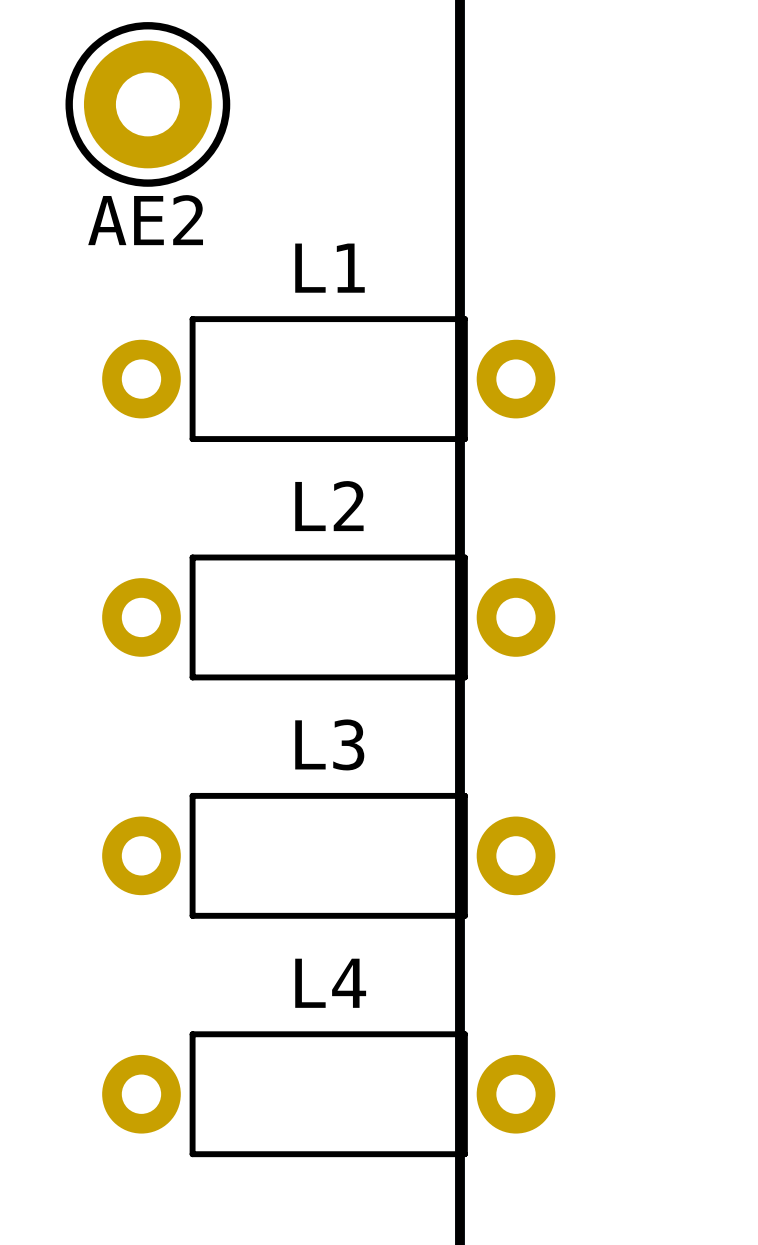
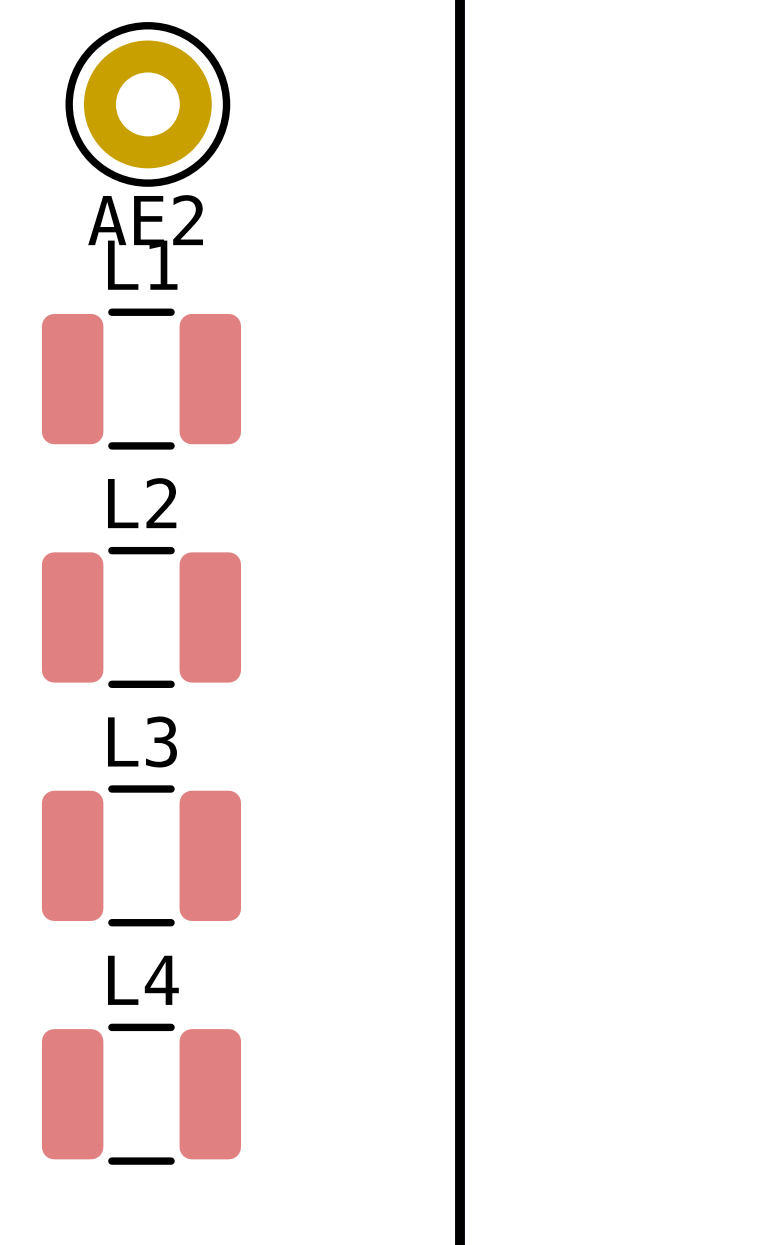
L1 footprint: [102, 316, 556, 443] -> [41, 308, 242, 450]
L2 footprint: [102, 554, 556, 681] -> [41, 546, 242, 689]
L3 footprint: [102, 792, 556, 919] -> [41, 785, 242, 927]
L4 footprint: [102, 1031, 556, 1158] -> [41, 1023, 242, 1165]

